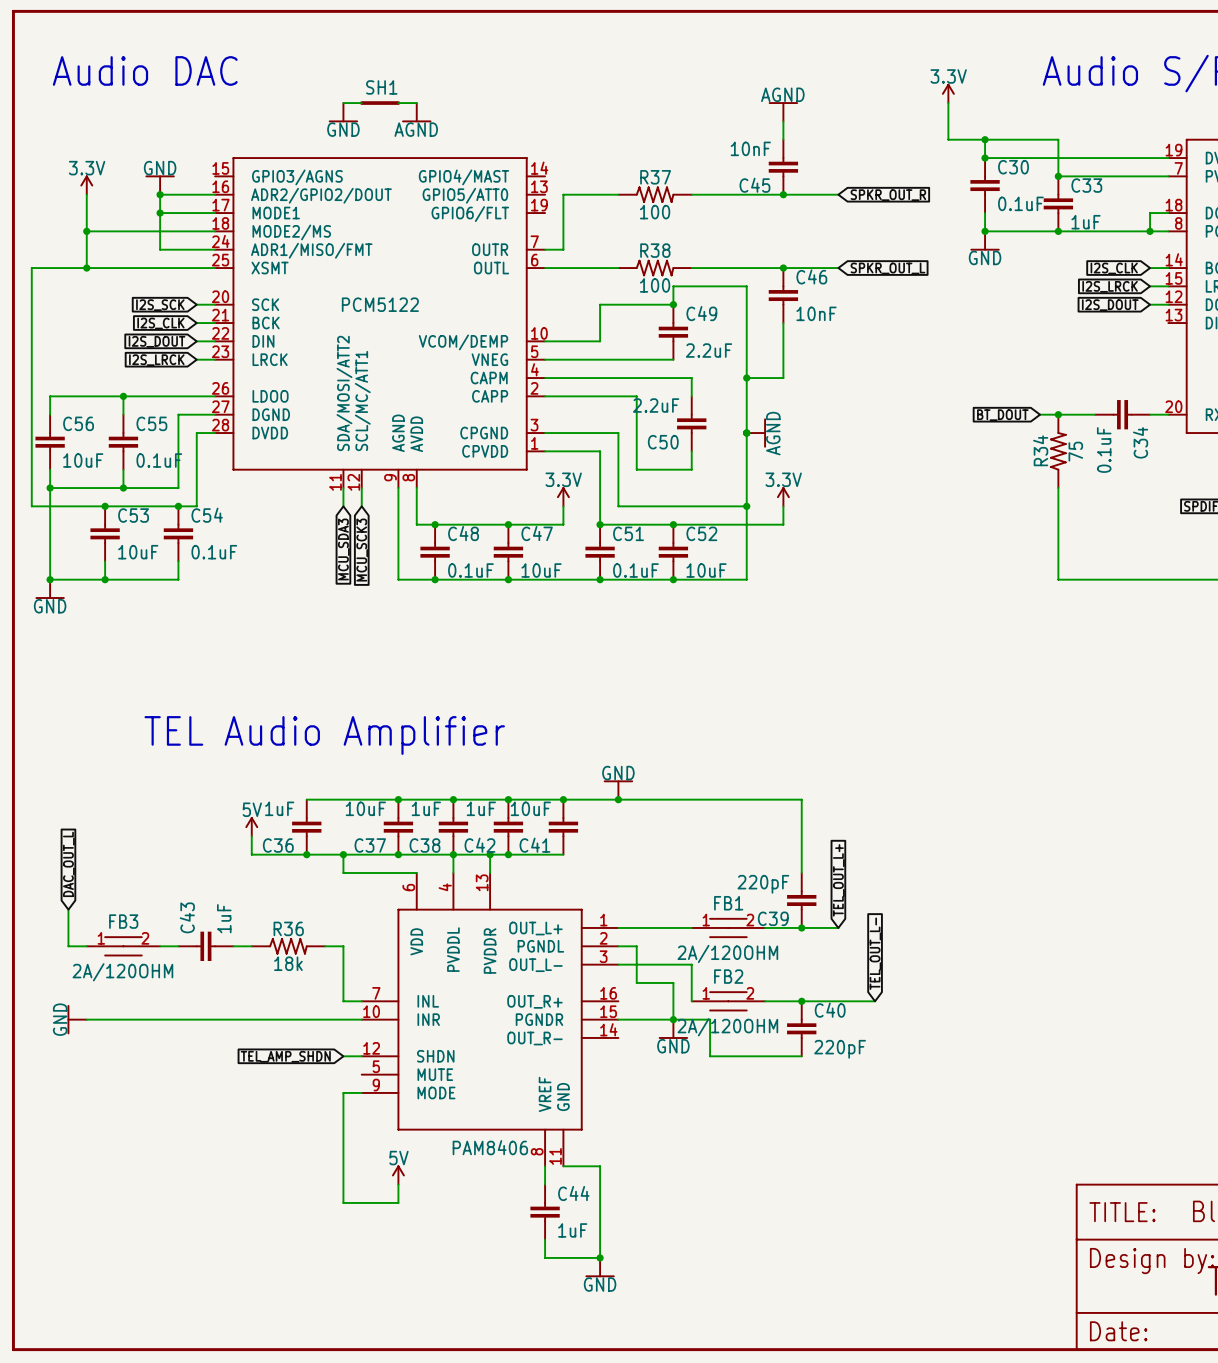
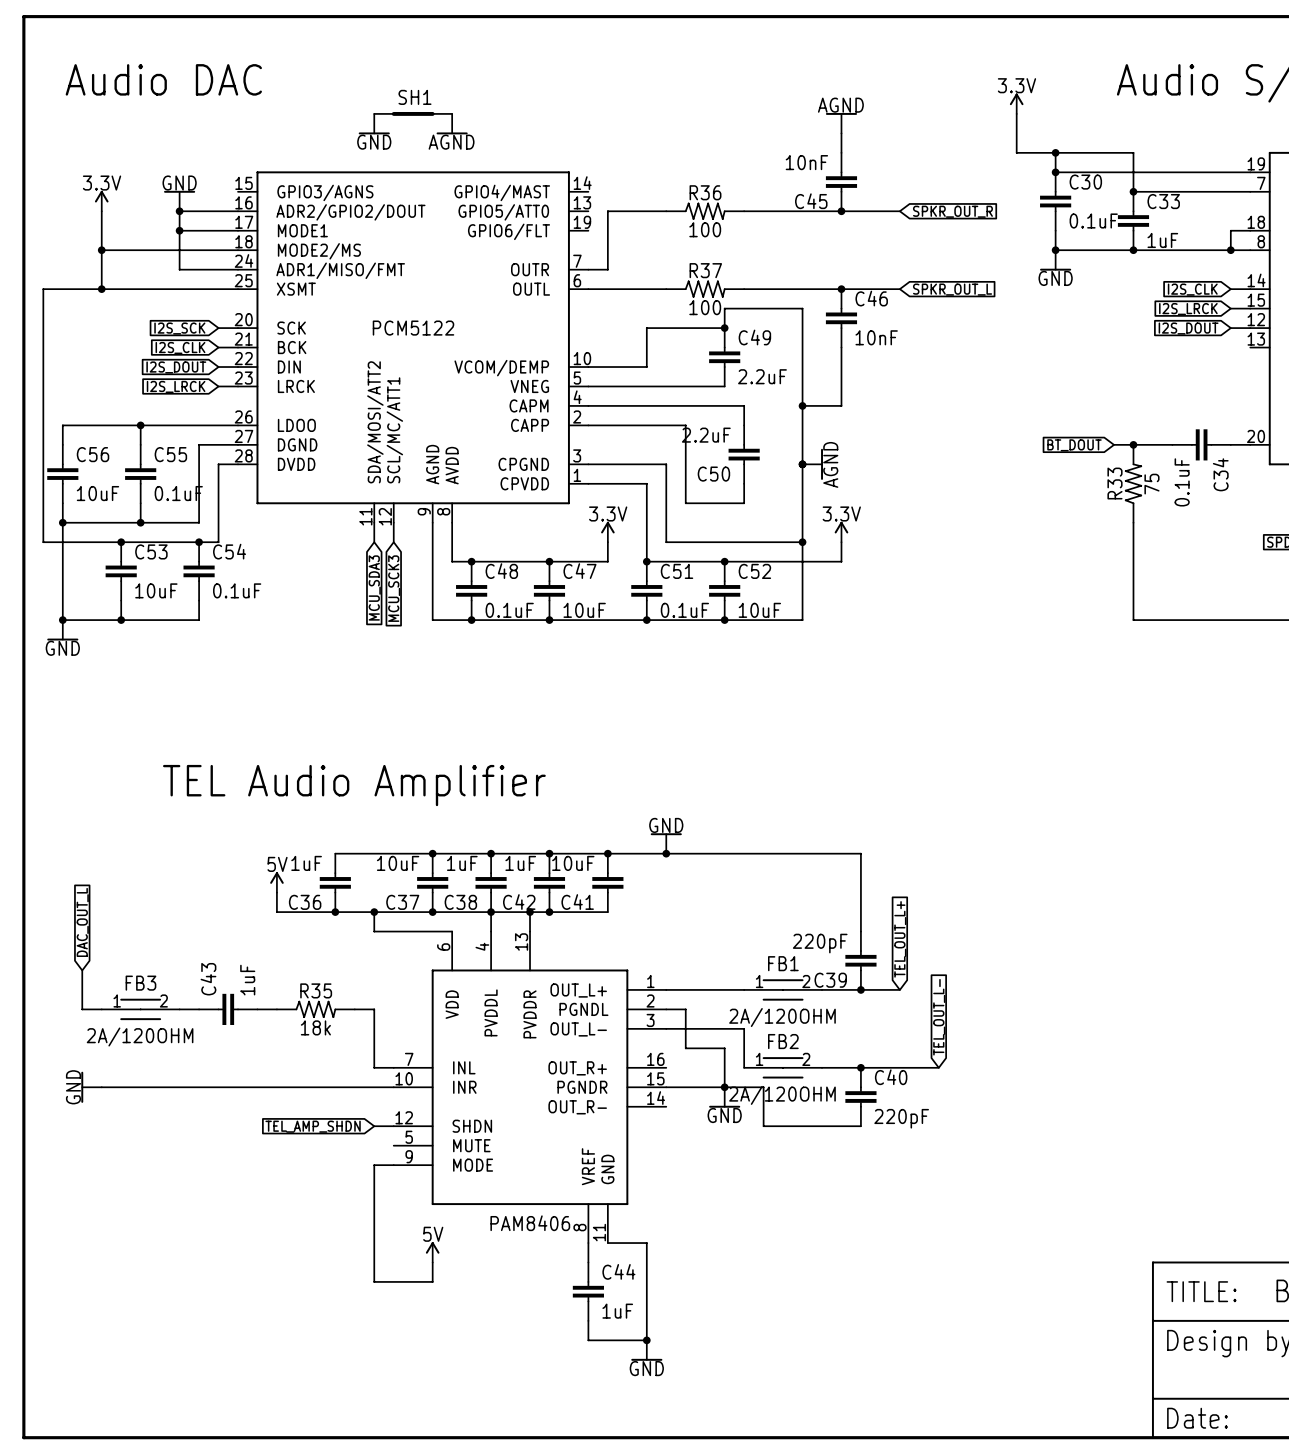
R37 name: R37 (655, 177) -> R36 (705, 192)
R38 name: R38 (655, 250) -> R37 (705, 270)
R34 name: R34 (1040, 450) -> R33 (1114, 483)
R36 name: R36 (288, 928) -> R35 (316, 990)

